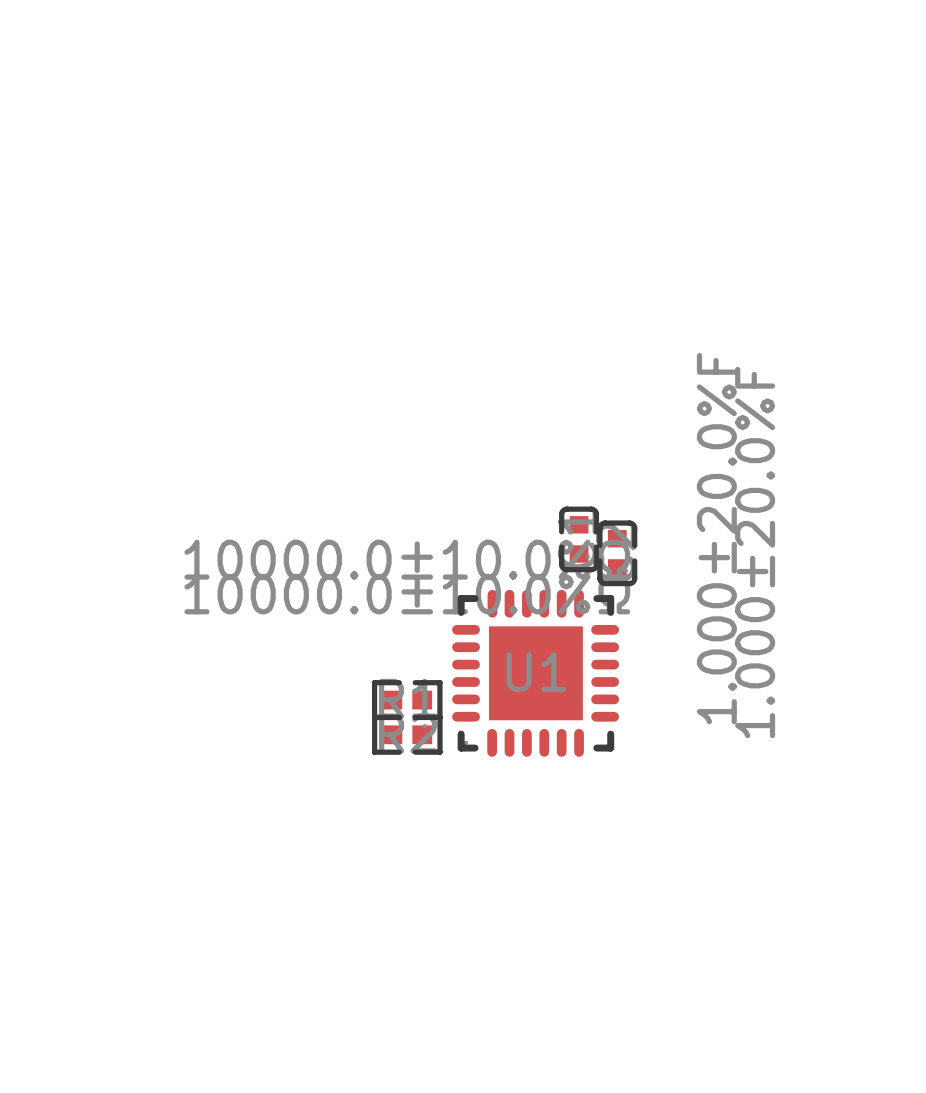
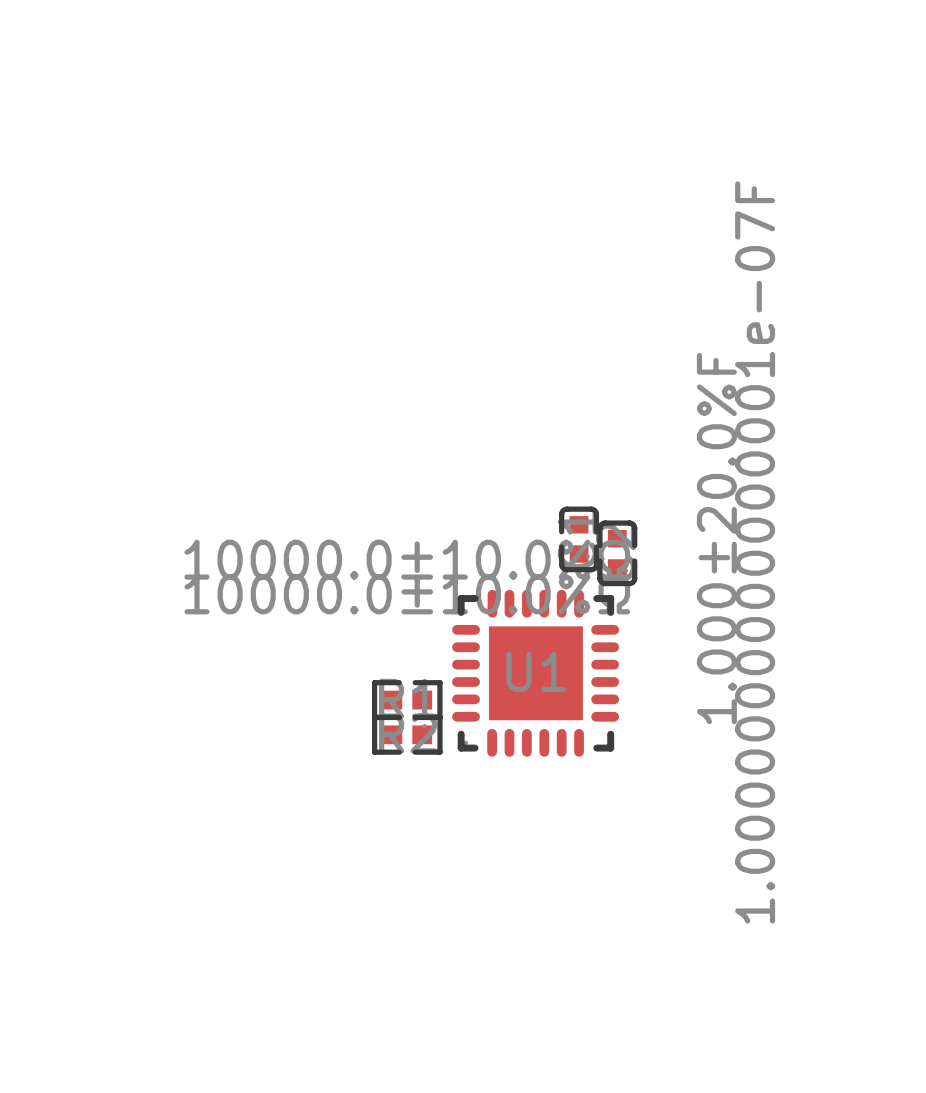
part value: 1.000±20.0%F (755, 552) -> 1.0000000000000001e-07F (755, 552)

